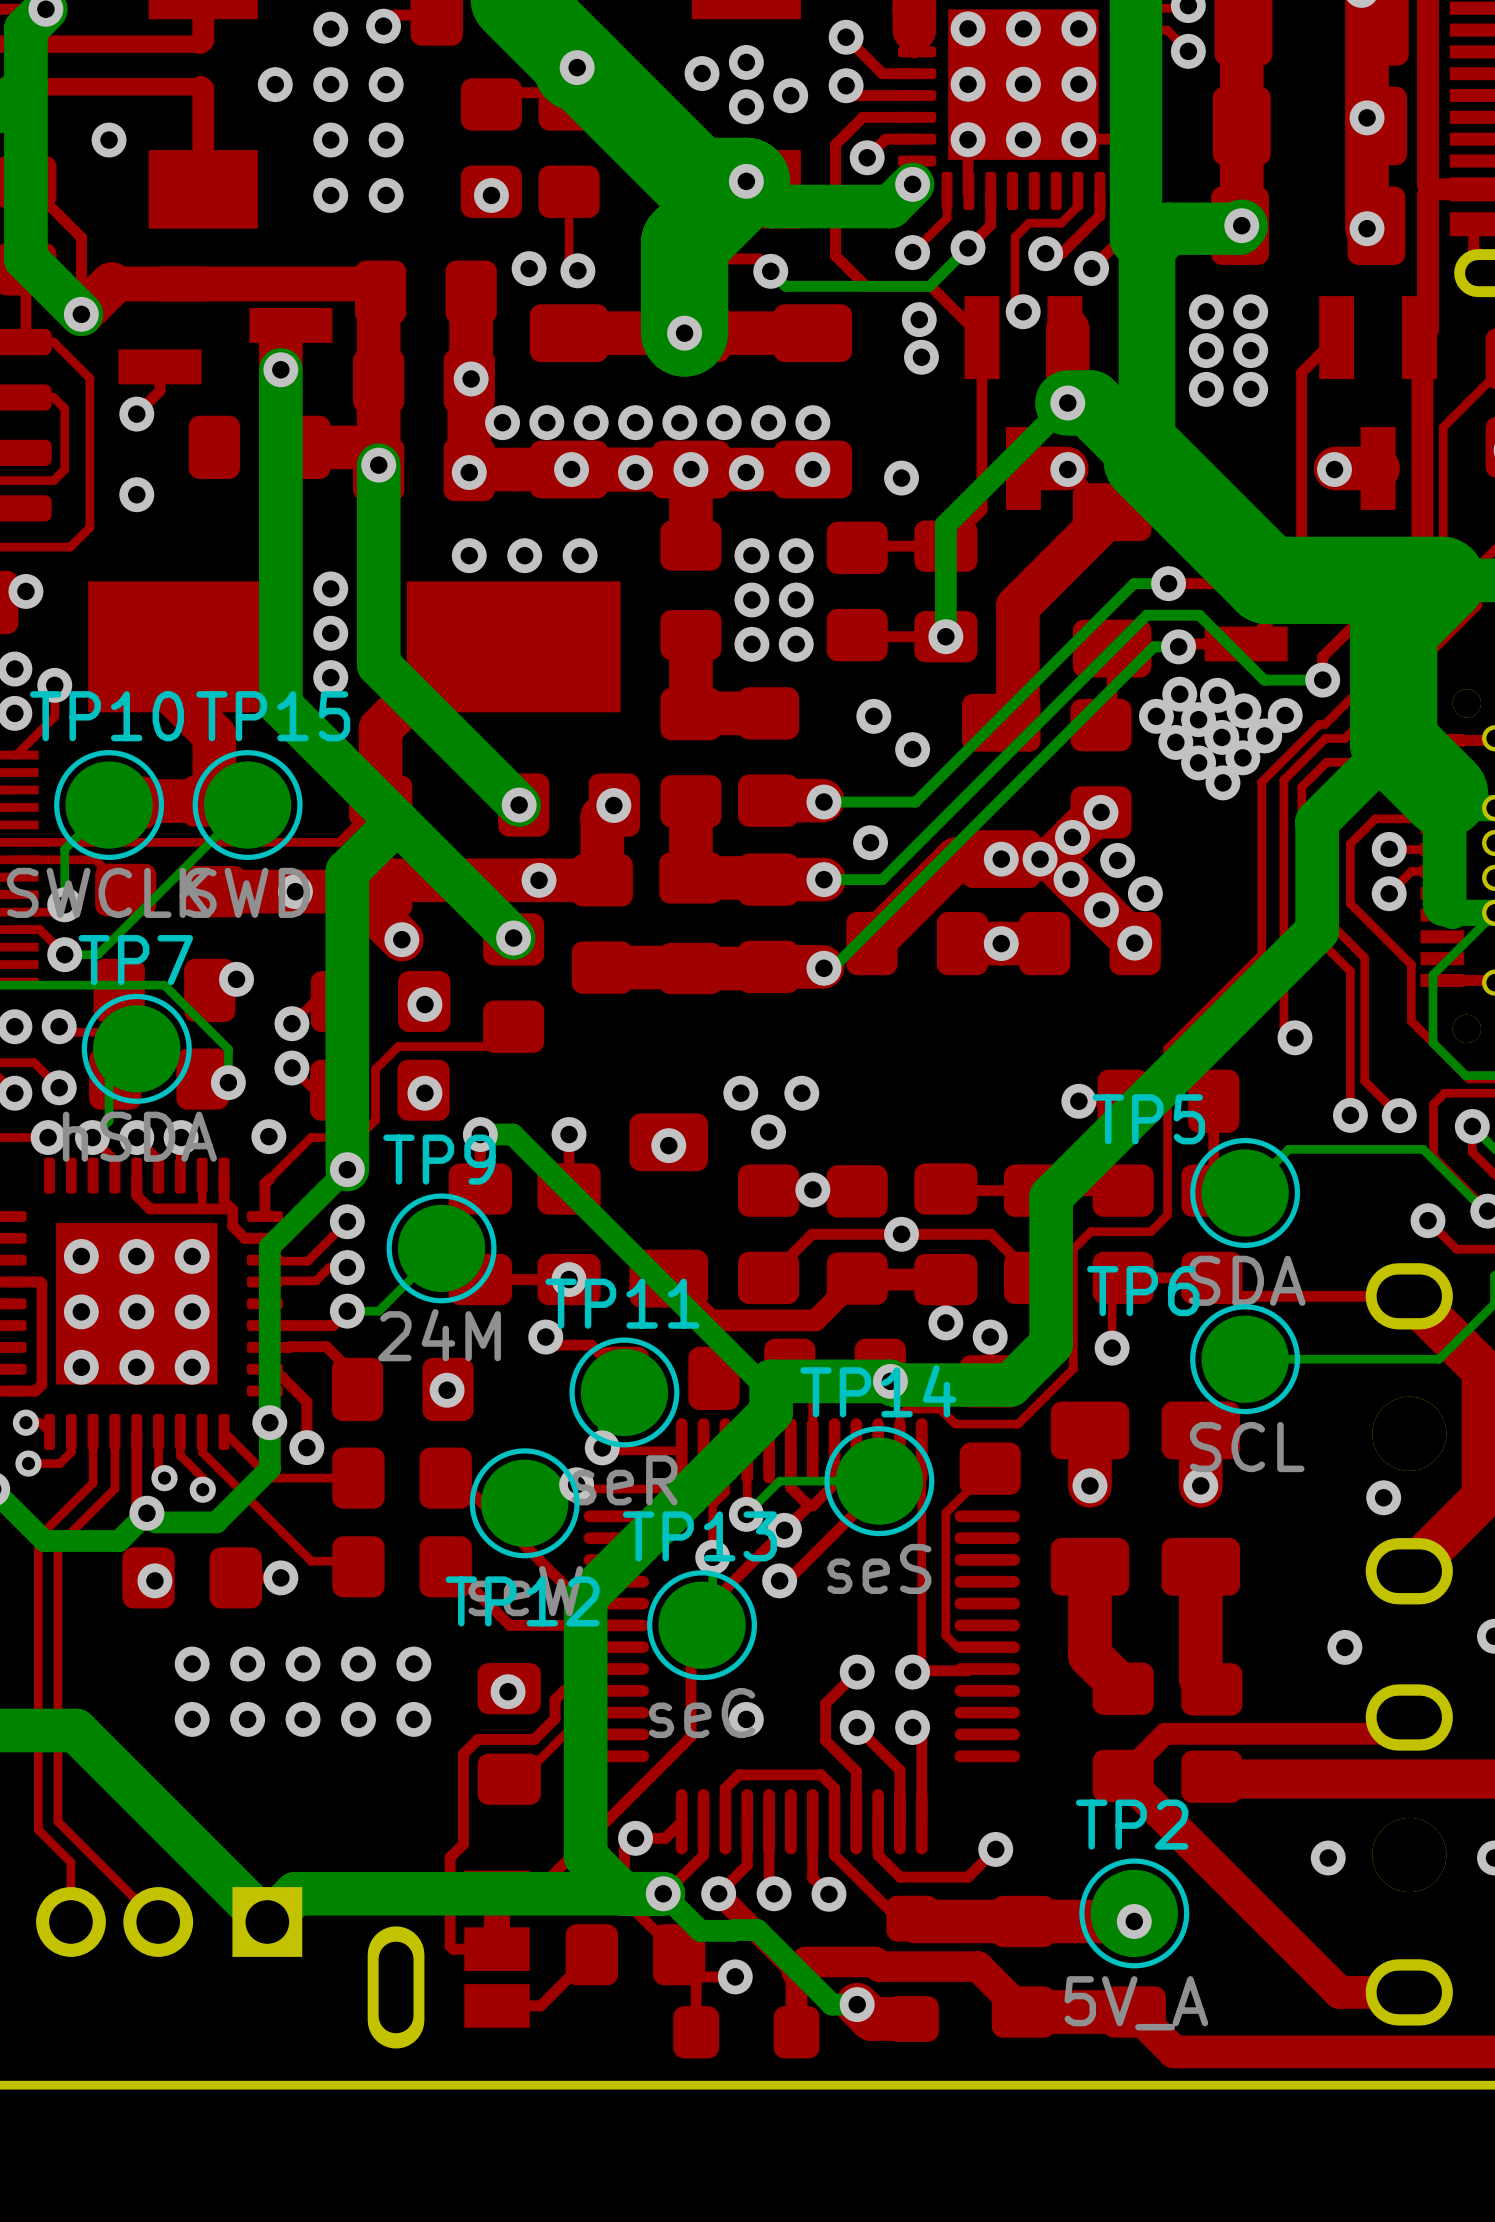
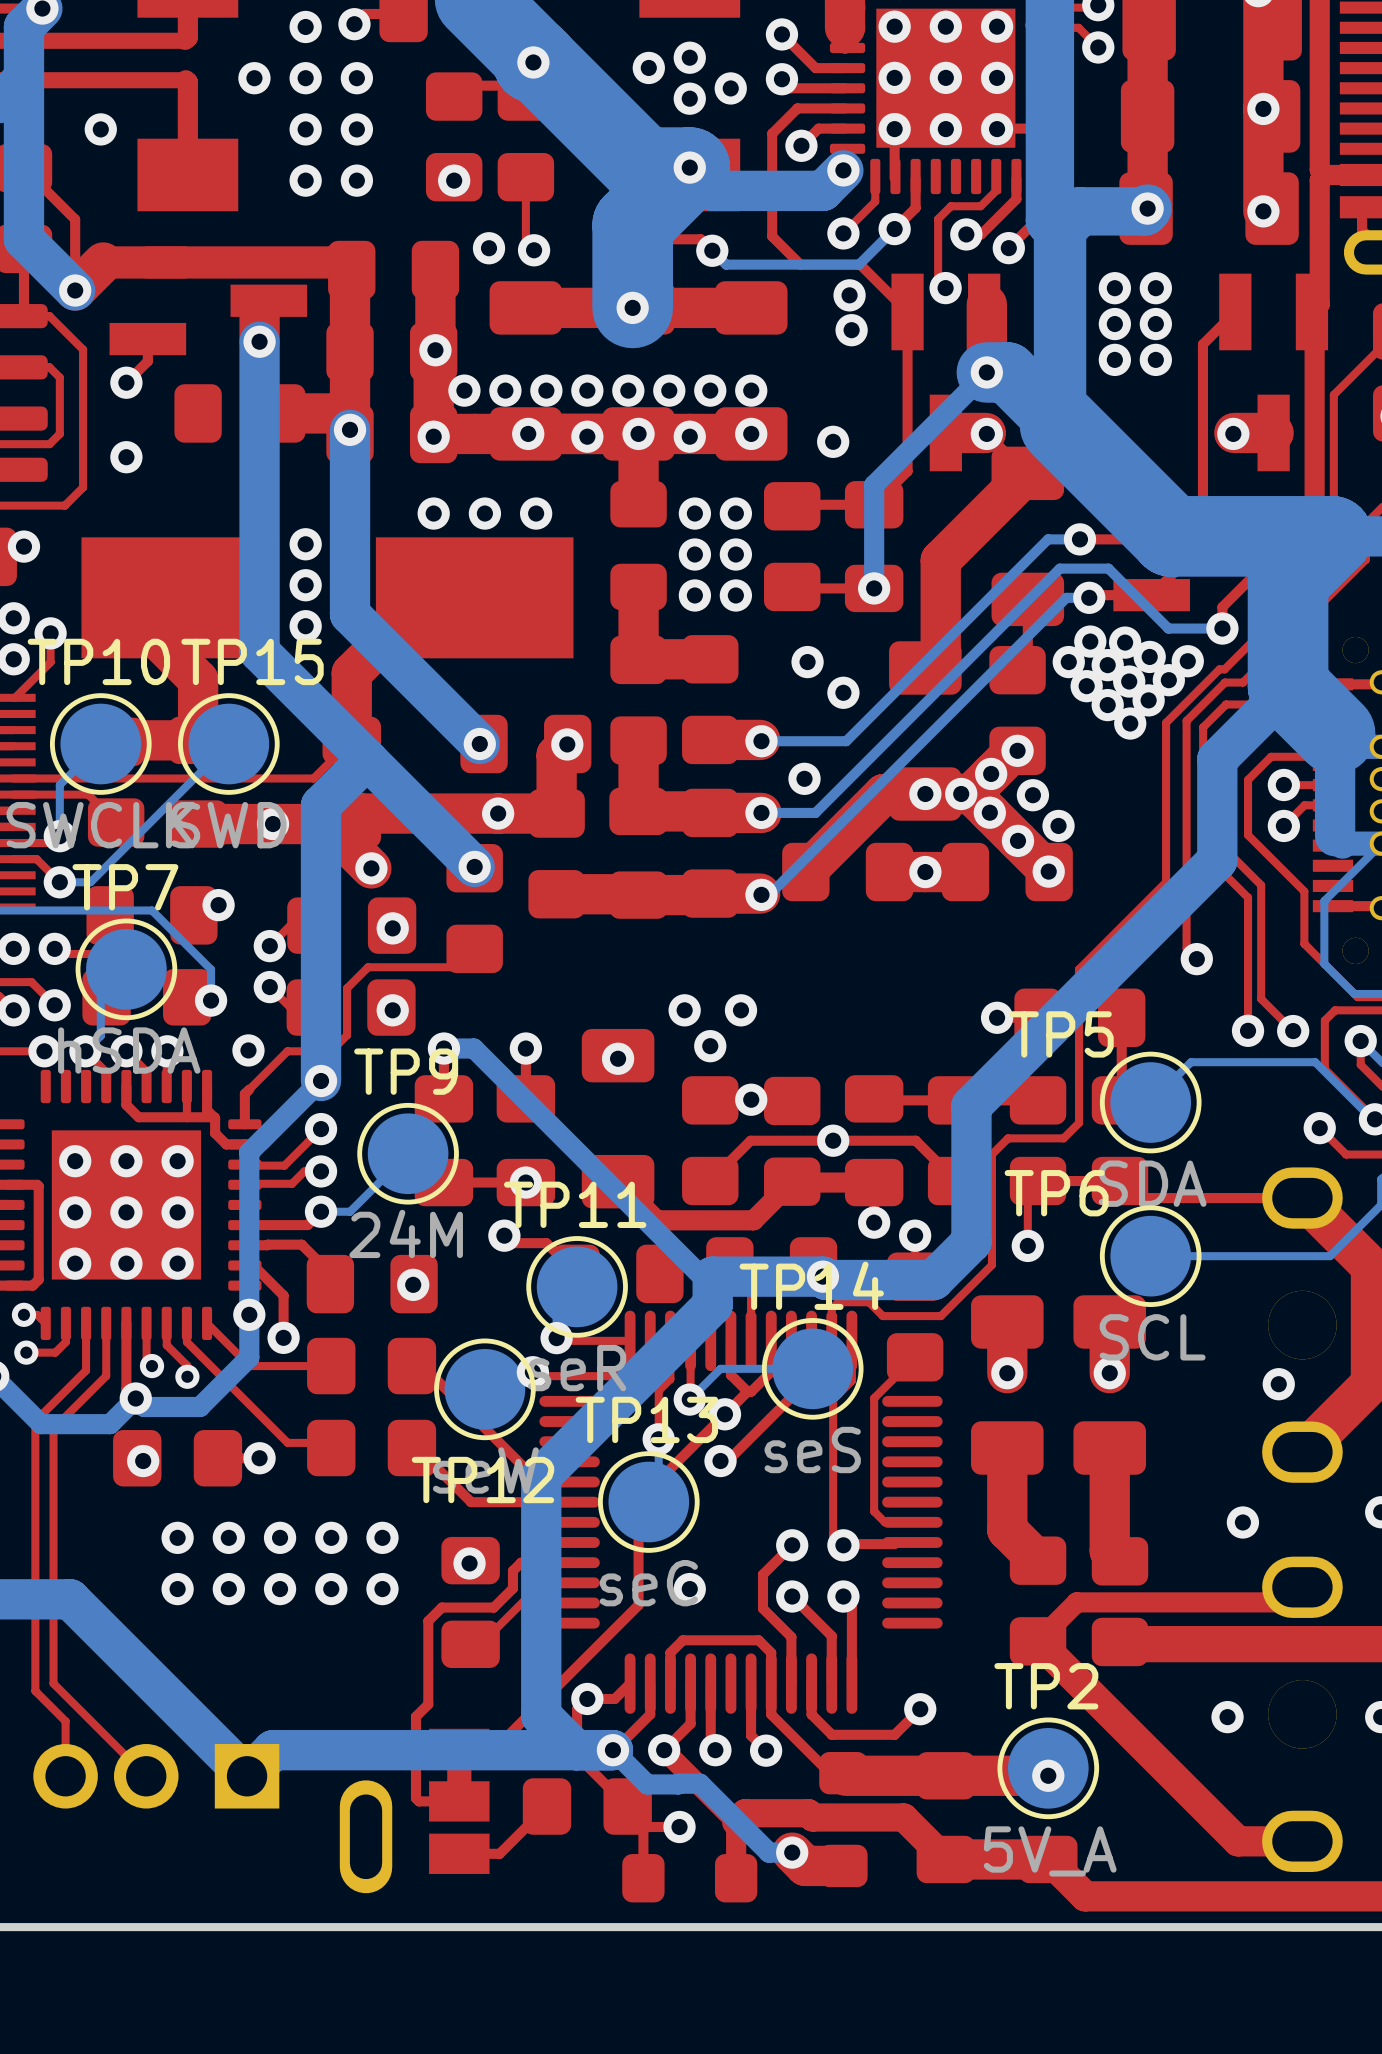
top track: (921, 1494) (921, 1662) (912, 1672) -> (851, 1380) (833, 1399) (833, 1535) (843, 1545)

